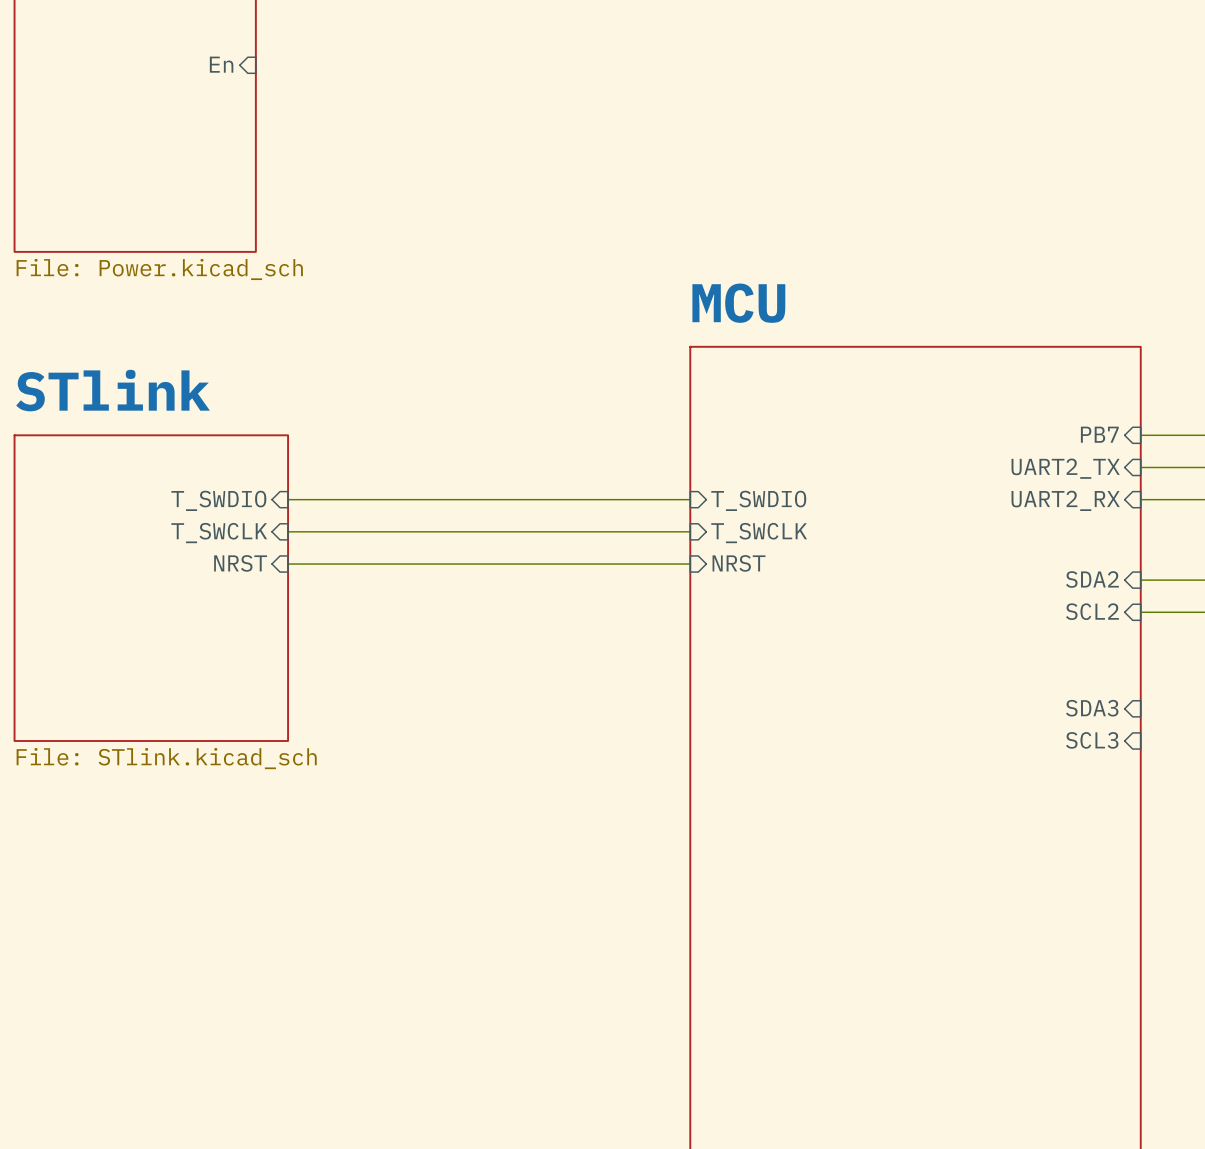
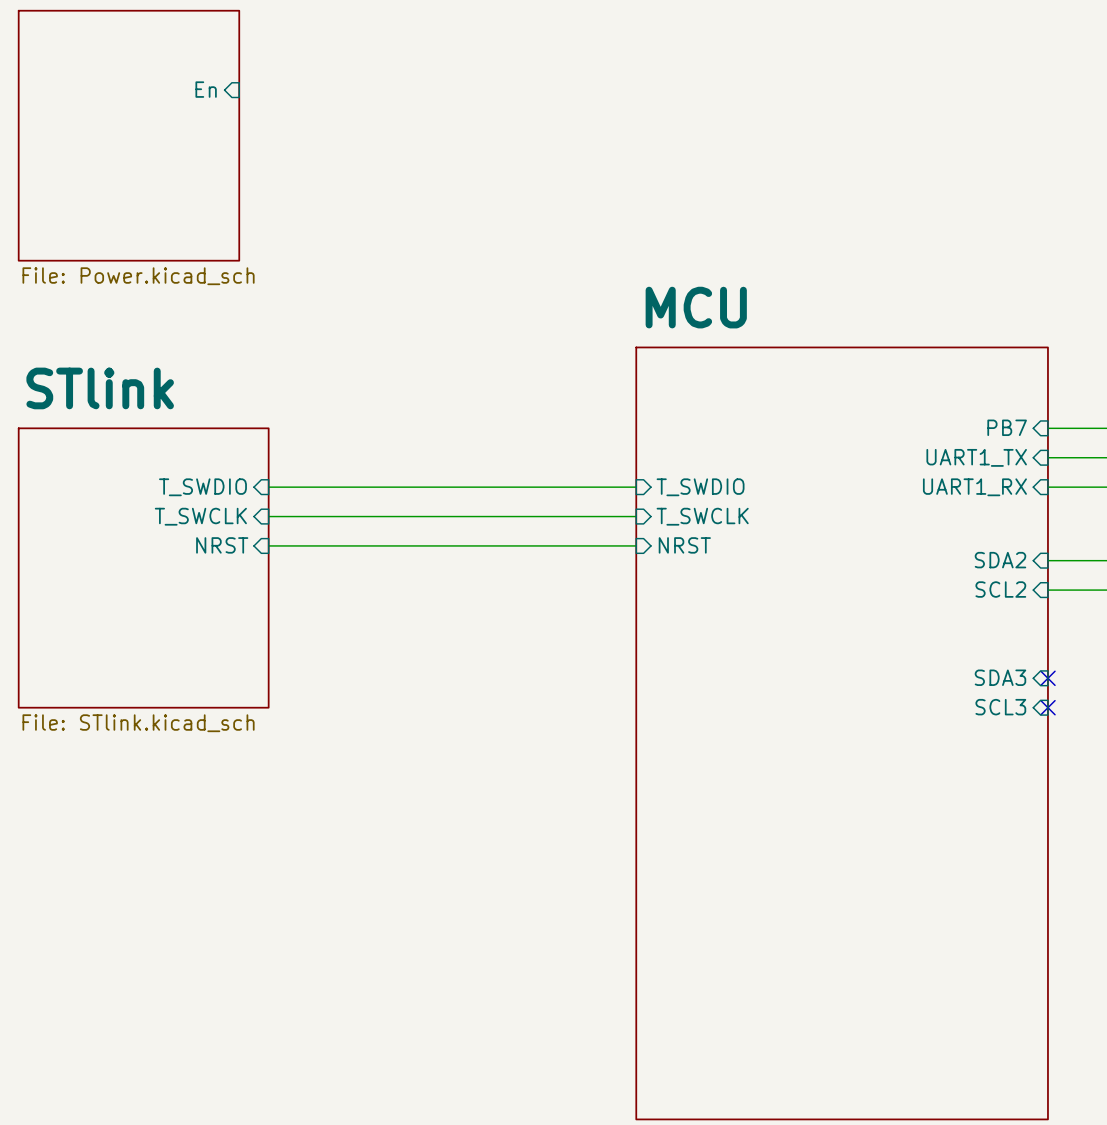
sheet pin: UART2_TX (1065, 468) -> UART1_TX (976, 457)
sheet pin: UART2_RX (1065, 500) -> UART1_RX (974, 487)
no-connect mark: none -> (1047, 678)
no-connect mark: none -> (1047, 707)

